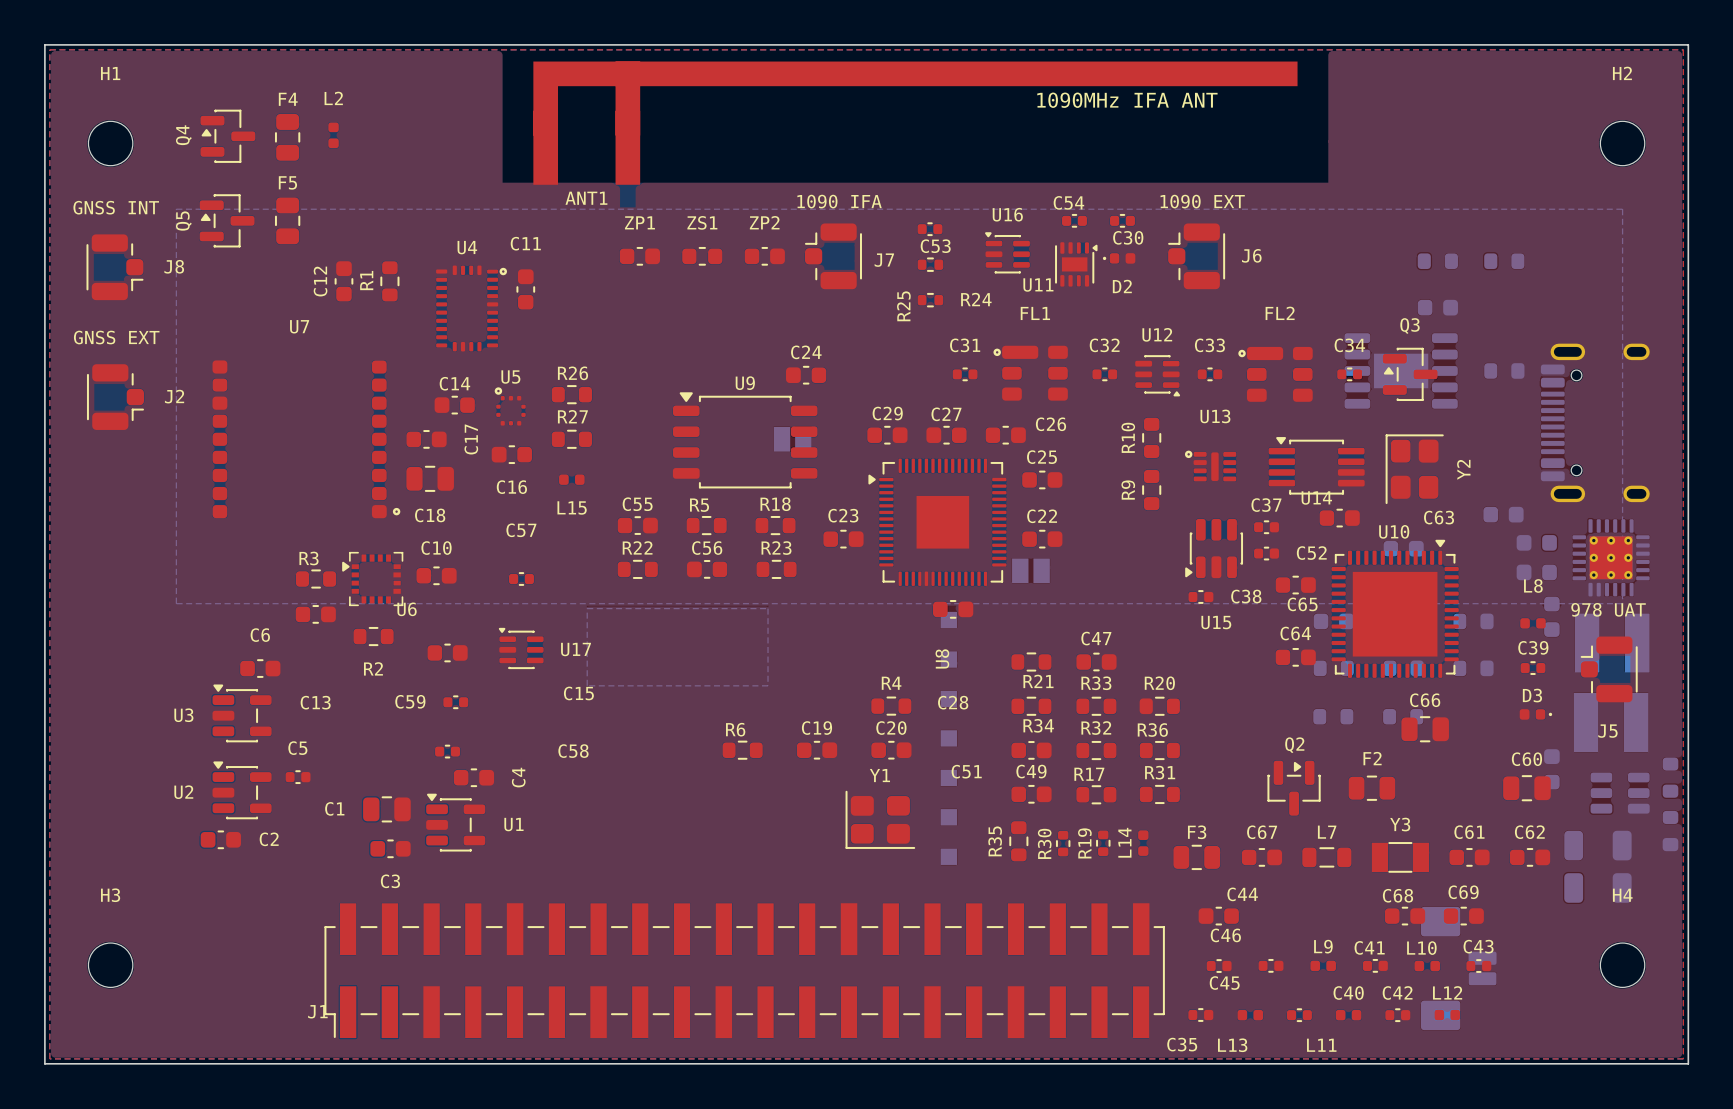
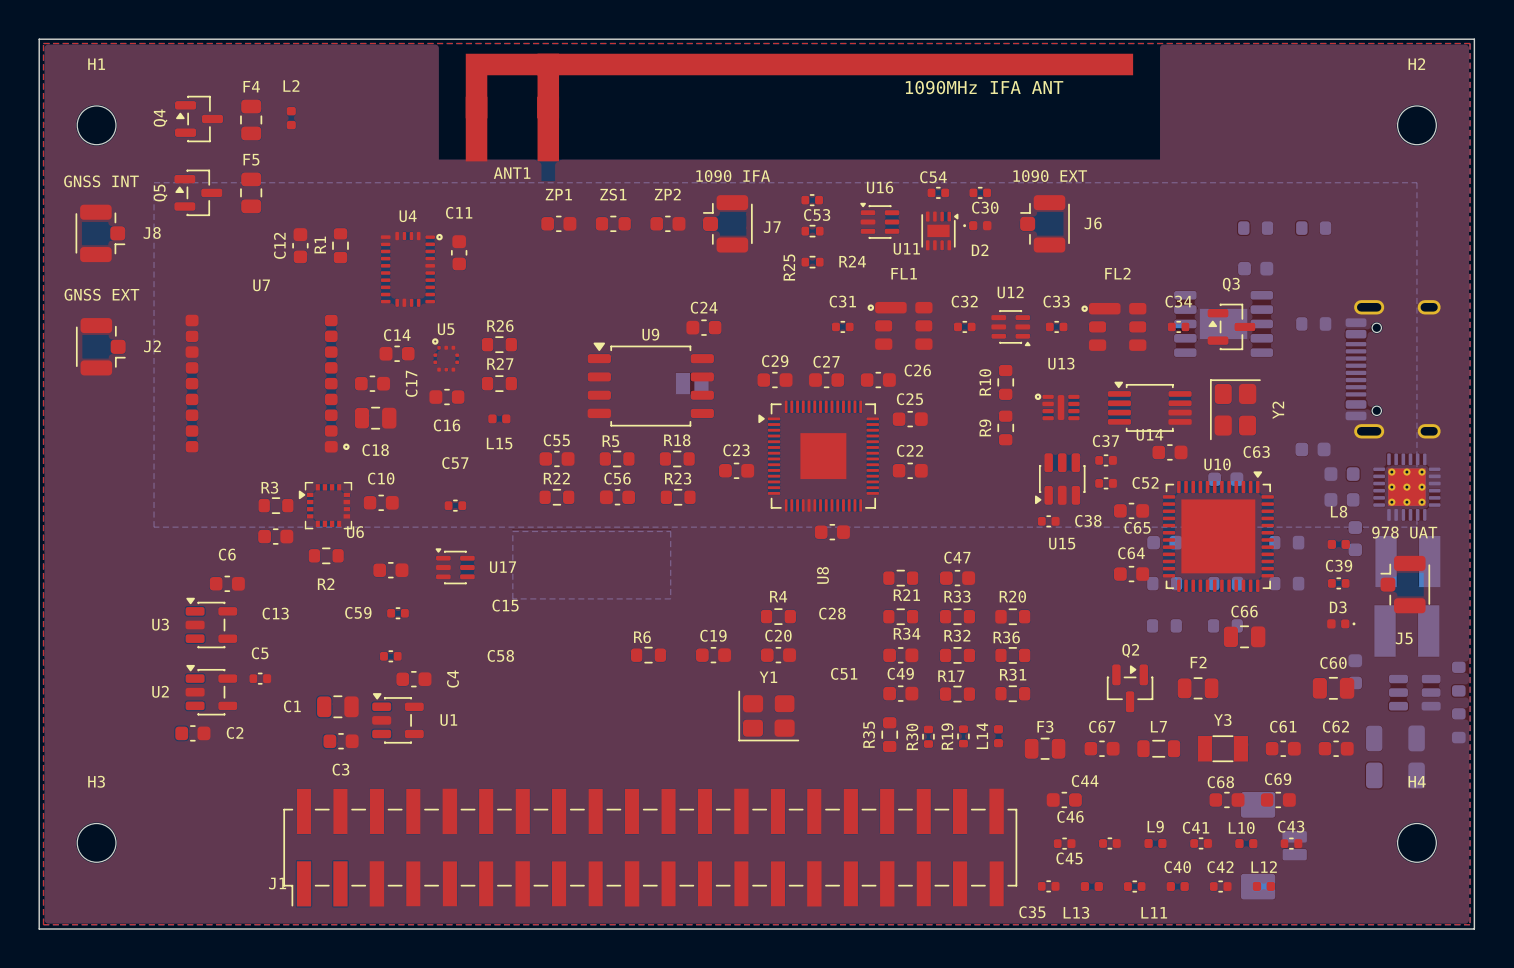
part: (1030, 570) -> none
part: (948, 620) -> none
part: (948, 659) -> none
part: (948, 698) -> none
part: (948, 738) -> none
part: (948, 777) -> none
part: (948, 817) -> none
part: (948, 856) -> none

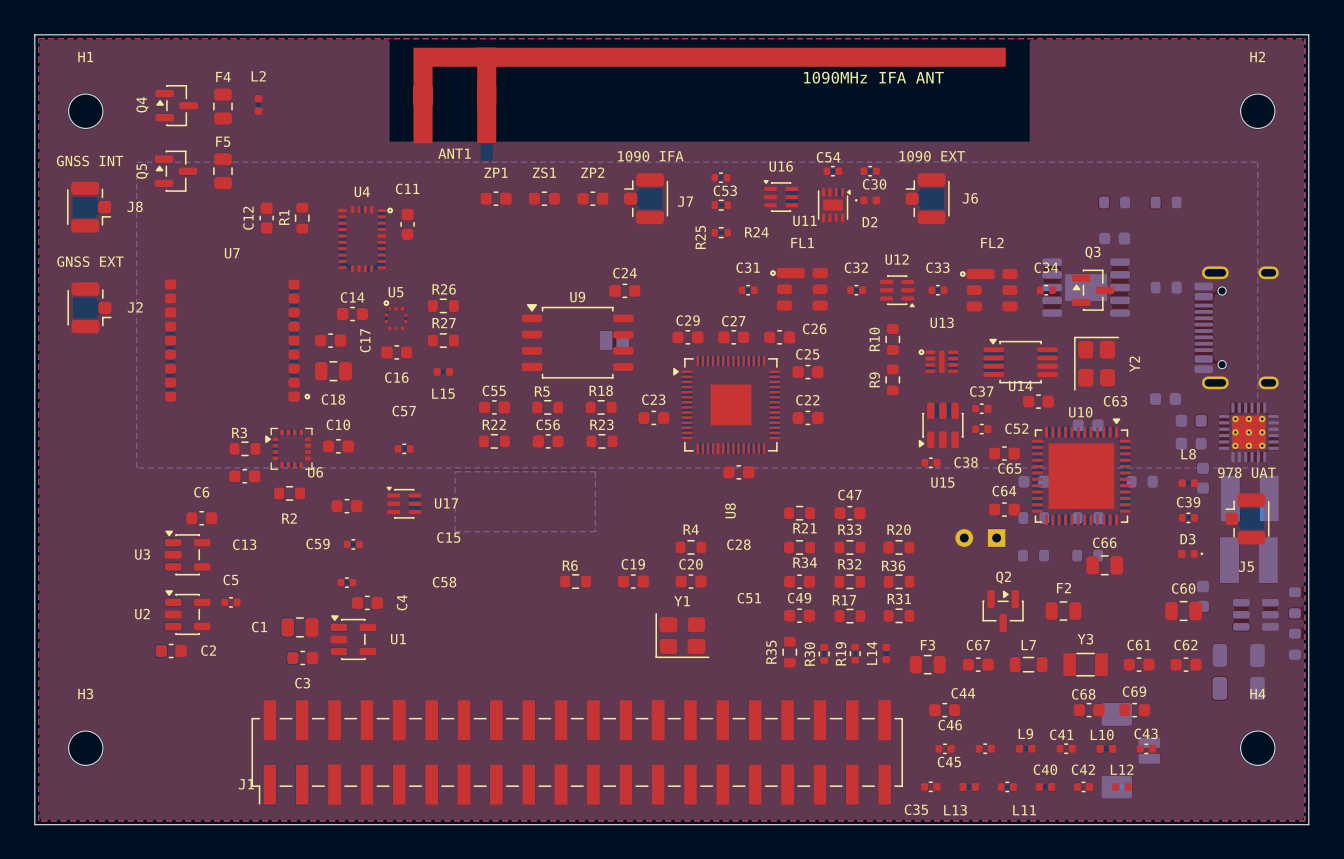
part: (1286, 583) -> none
part: none -> (980, 538)

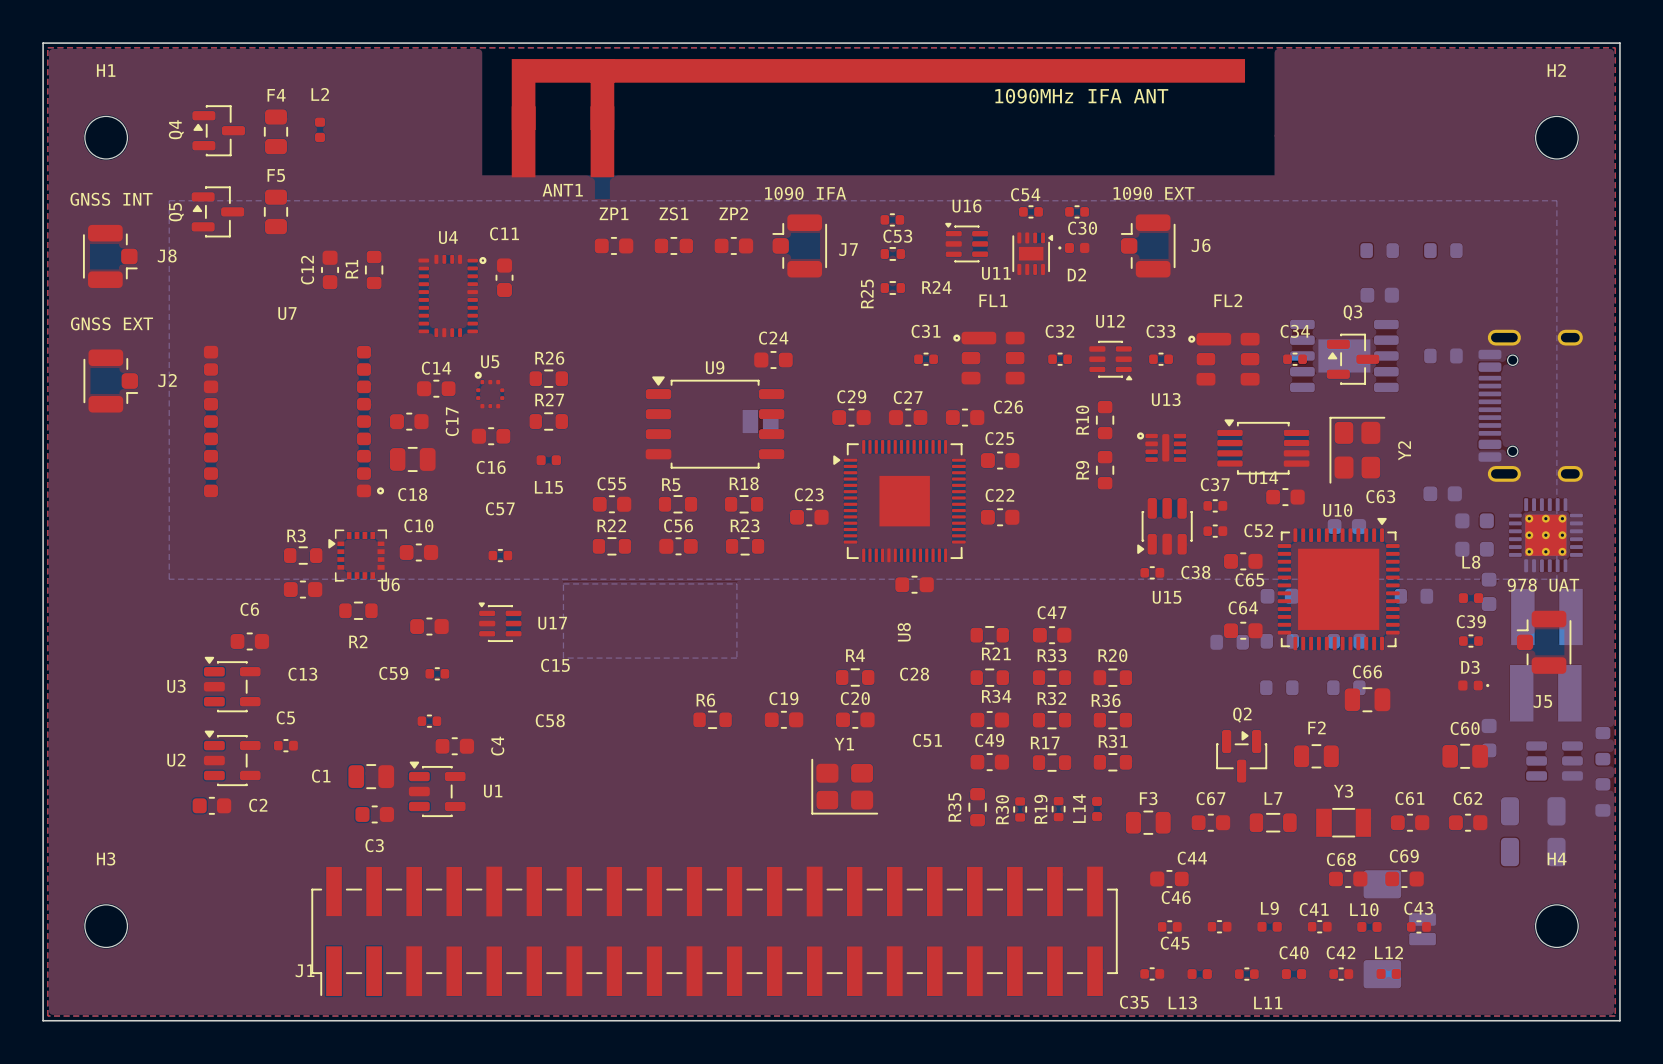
part: none -> (1229, 642)
part: (980, 538) -> none

